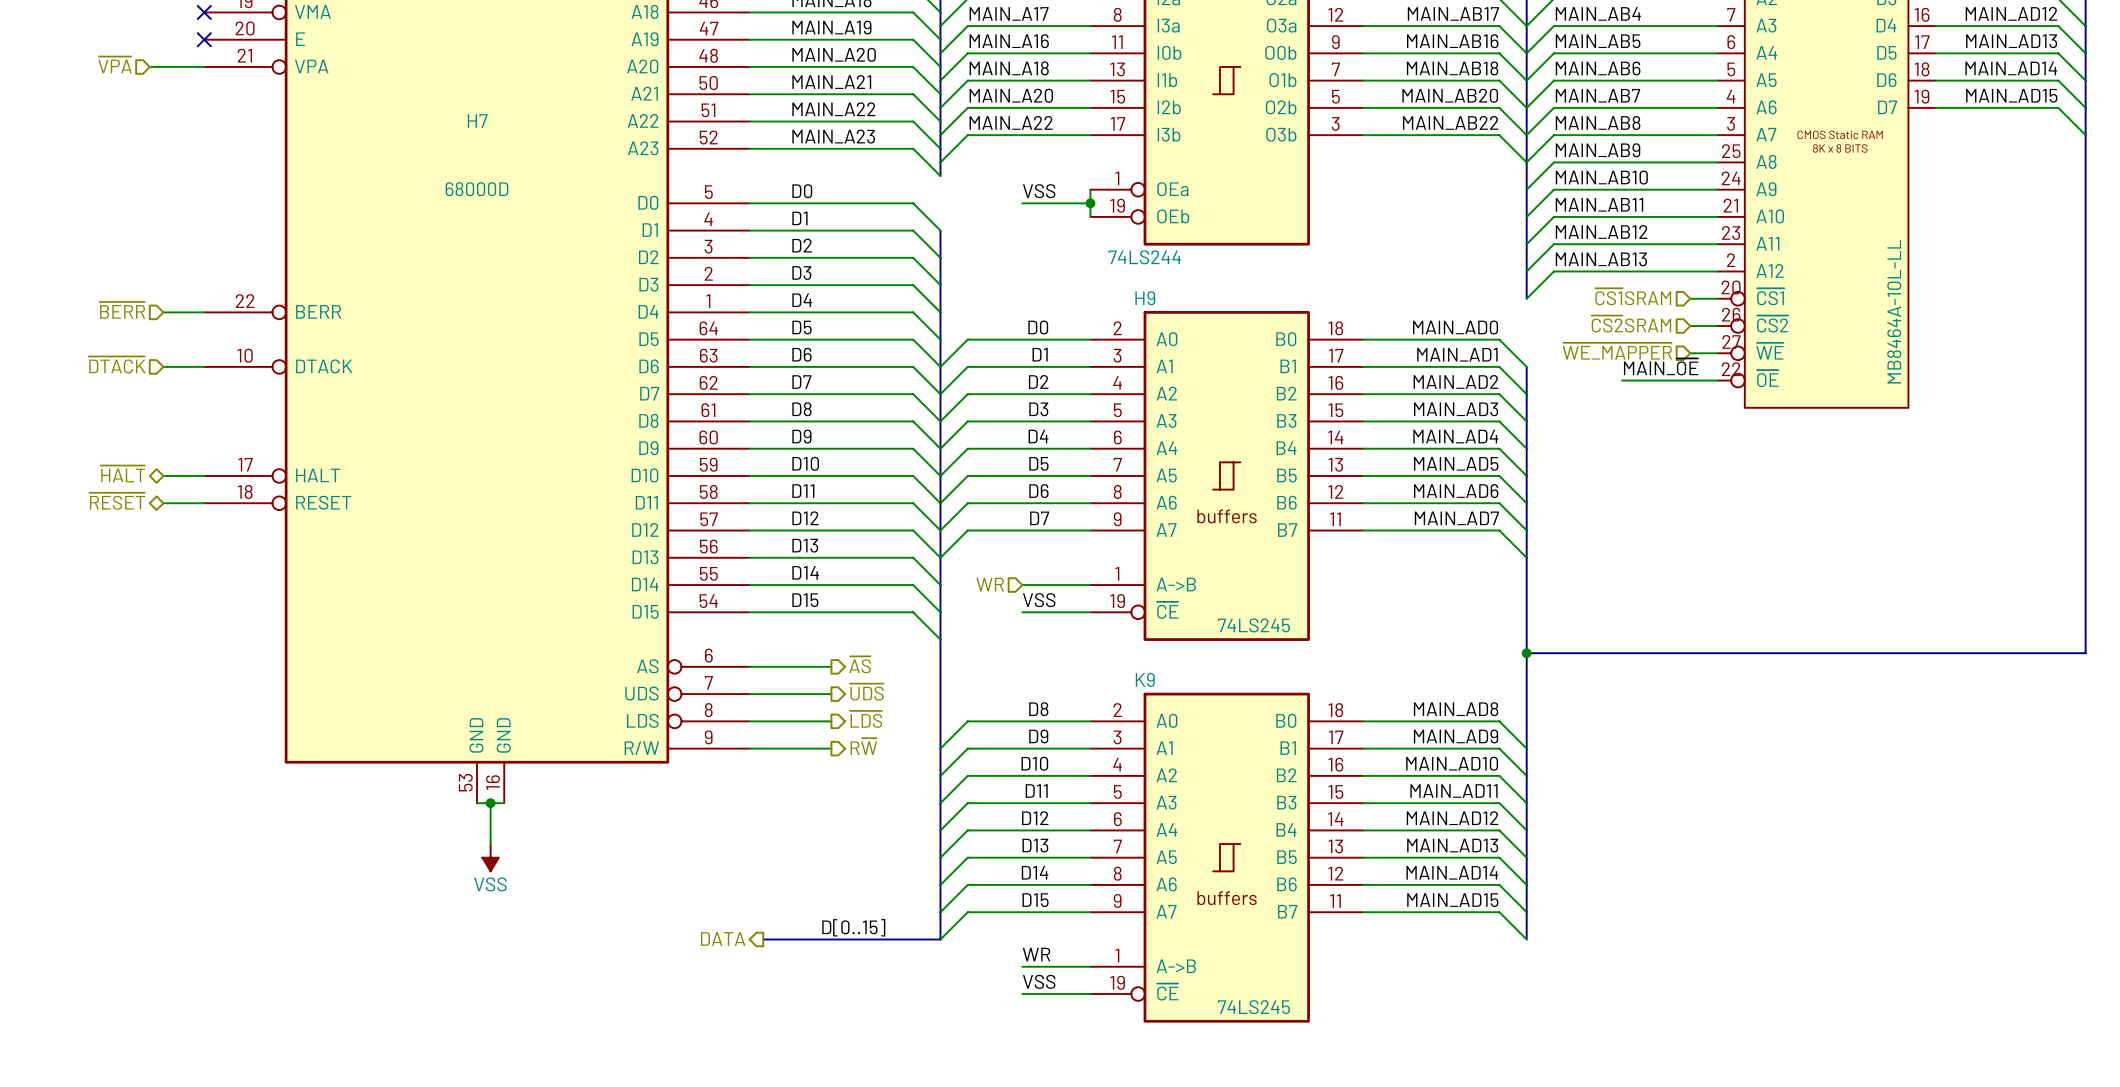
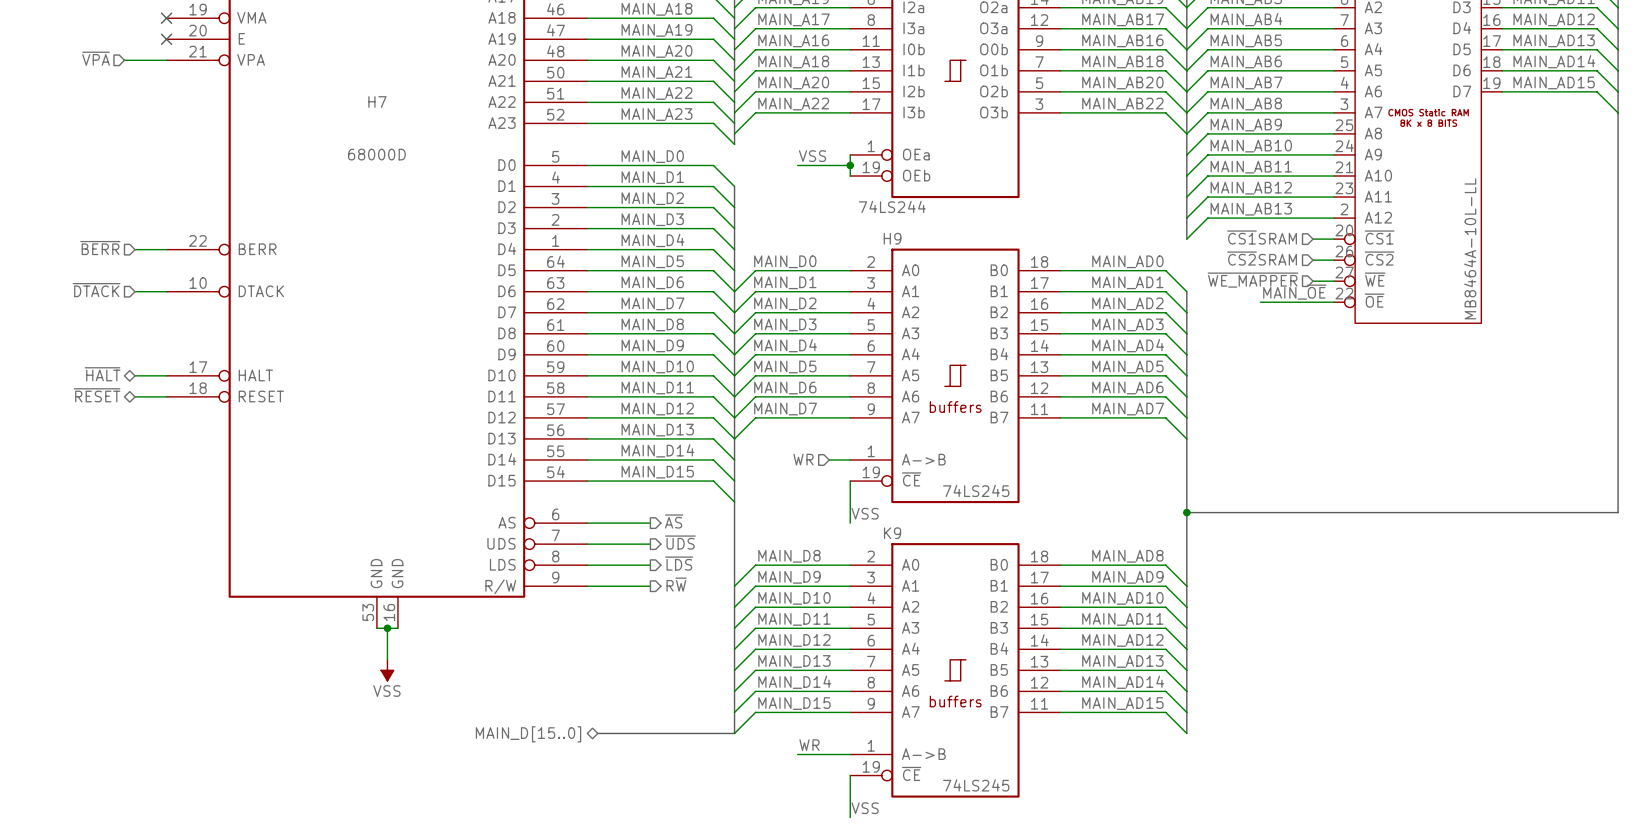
label: D0 (802, 191) -> MAIN_D0 (652, 156)
label: D1 (799, 218) -> MAIN_D1 (652, 177)
label: D2 (802, 245) -> MAIN_D2 (652, 198)
label: D3 (801, 273) -> MAIN_D3 (652, 219)
label: D4 (802, 300) -> MAIN_D4 (652, 240)
label: D5 (801, 327) -> MAIN_D5 (652, 261)
label: D0 (1038, 327) -> MAIN_D0 (785, 261)
label: D6 (801, 354) -> MAIN_D6 (652, 282)
label: D1 (1040, 354) -> MAIN_D1 (785, 282)
label: D2 (1038, 381) -> MAIN_D2 (785, 303)
label: D7 (801, 382) -> MAIN_D7 (652, 303)
label: D8 (801, 409) -> MAIN_D8 (652, 324)
label: D3 (1038, 409) -> MAIN_D3 (785, 324)
label: D9 (801, 436) -> MAIN_D9 (652, 345)
label: D4 (1038, 436) -> MAIN_D4 (785, 345)
label: D10 (805, 463) -> MAIN_D10 (657, 366)
label: D5 (1038, 463) -> MAIN_D5 (785, 366)
label: D11 (803, 491) -> MAIN_D11 (657, 388)
label: D6 (1038, 491) -> MAIN_D6 (785, 388)
label: D12 (805, 518) -> MAIN_D12 (657, 409)
label: D7 (1039, 518) -> MAIN_D7 (785, 409)
label: D13 (805, 545) -> MAIN_D13 (657, 430)
label: D14 (805, 572) -> MAIN_D14 (657, 450)
hierarchical label position: WR (990, 584) -> WR (803, 459)
wire: (1022, 585) (1063, 585) -> none
label: D15 (805, 600) -> MAIN_D15 (657, 472)
label position: VSS (1039, 600) -> VSS (865, 513)
wire: (1022, 612) (1090, 612) -> (850, 523) (850, 481)
label: none -> MAIN_D8 (789, 556)
label: D8 (1038, 709) -> none
label: none -> MAIN_D9 (789, 577)
label: D9 (1038, 736) -> none
label: none -> MAIN_D10 (794, 598)
label: D10 (1034, 763) -> none
label: none -> MAIN_D11 (794, 619)
label: D11 (1036, 791) -> none
label: none -> MAIN_D12 (794, 640)
label: D12 (1035, 818) -> none
label: none -> MAIN_D13 (794, 661)
label: D13 (1035, 845) -> none
label: none -> MAIN_D14 (794, 682)
label: D14 (1035, 872) -> none
label: none -> MAIN_D15 (794, 703)
label: D15 (1035, 900) -> none
label: D[0..15] (853, 927) -> none
hierarchical label shape: output (723, 938) -> bidirectional (528, 734)
hierarchical label: DATA (723, 938) -> MAIN_D[15..0] (528, 734)
label position: VSS (1039, 981) -> VSS (865, 808)
wire: (1022, 994) (1090, 994) -> (850, 817) (850, 775)

